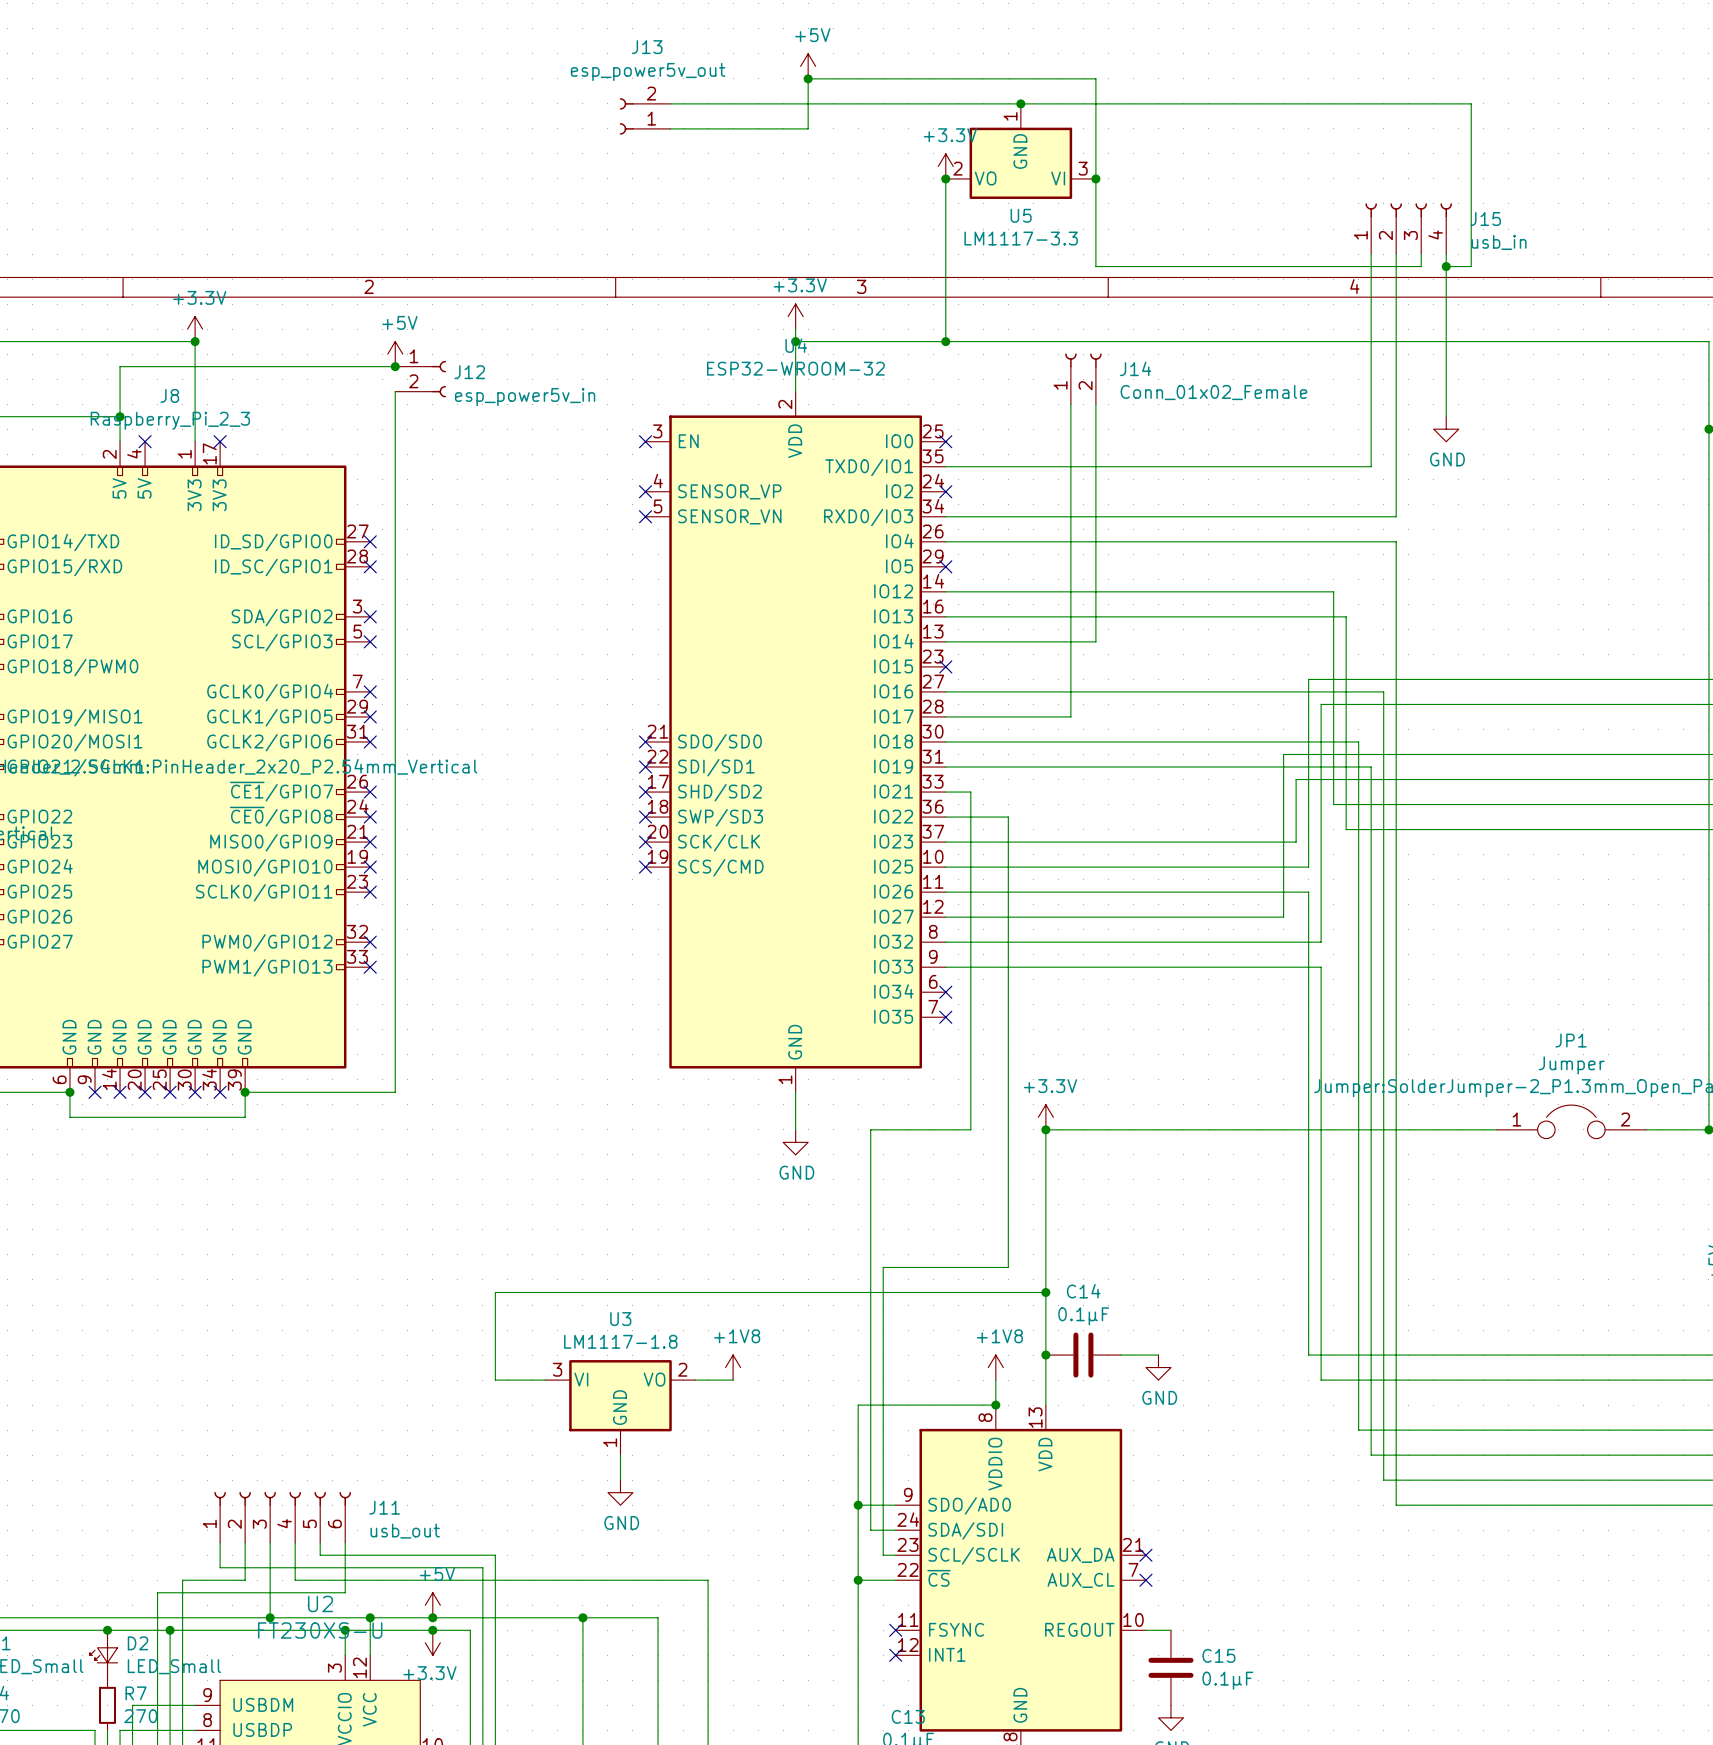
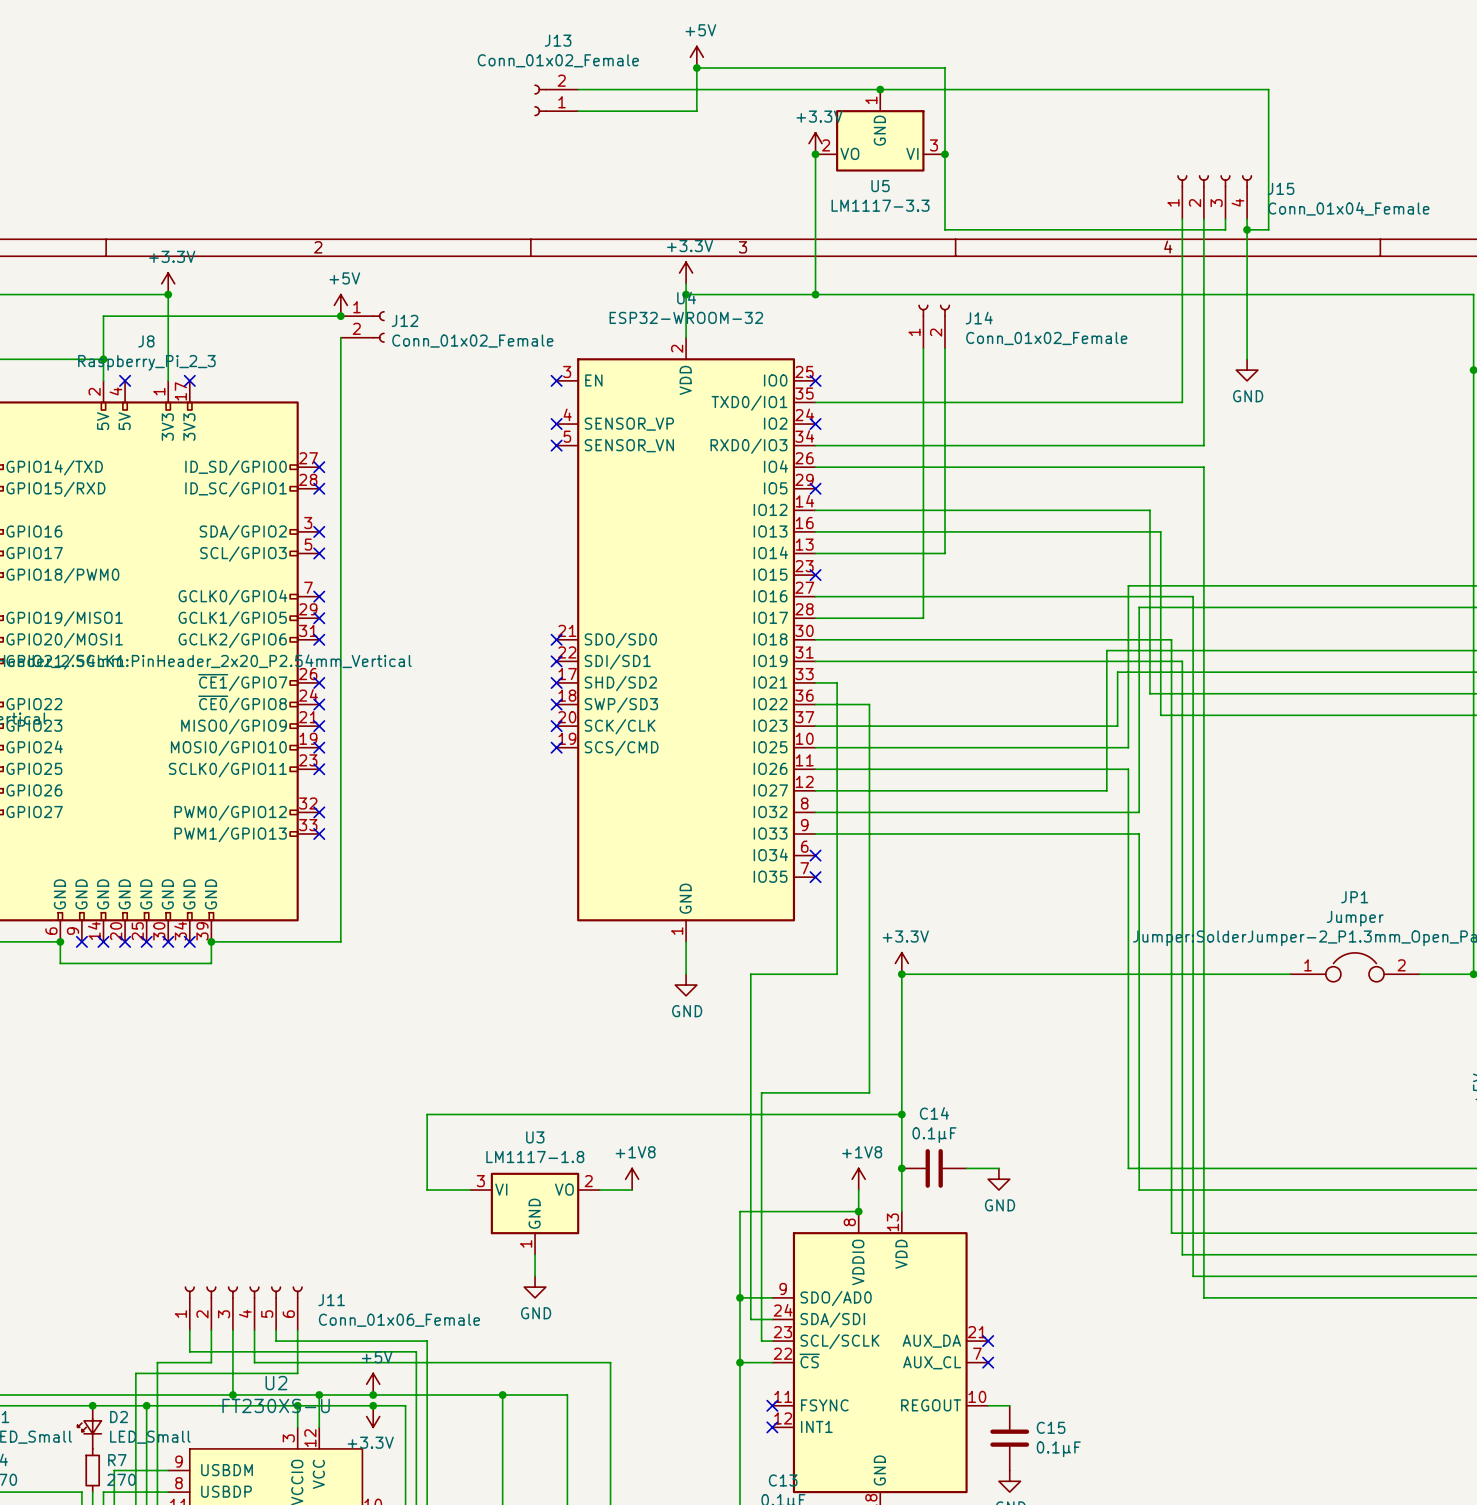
J13 value: esp_power5v_out (648, 71) -> Conn_01x02_Female (558, 60)
J15 value: usb_in (1499, 242) -> Conn_01x04_Female (1348, 208)
J12 value: esp_power5v_in (525, 397) -> Conn_01x02_Female (472, 341)
J11 value: usb_out (405, 1531) -> Conn_01x06_Female (399, 1320)

